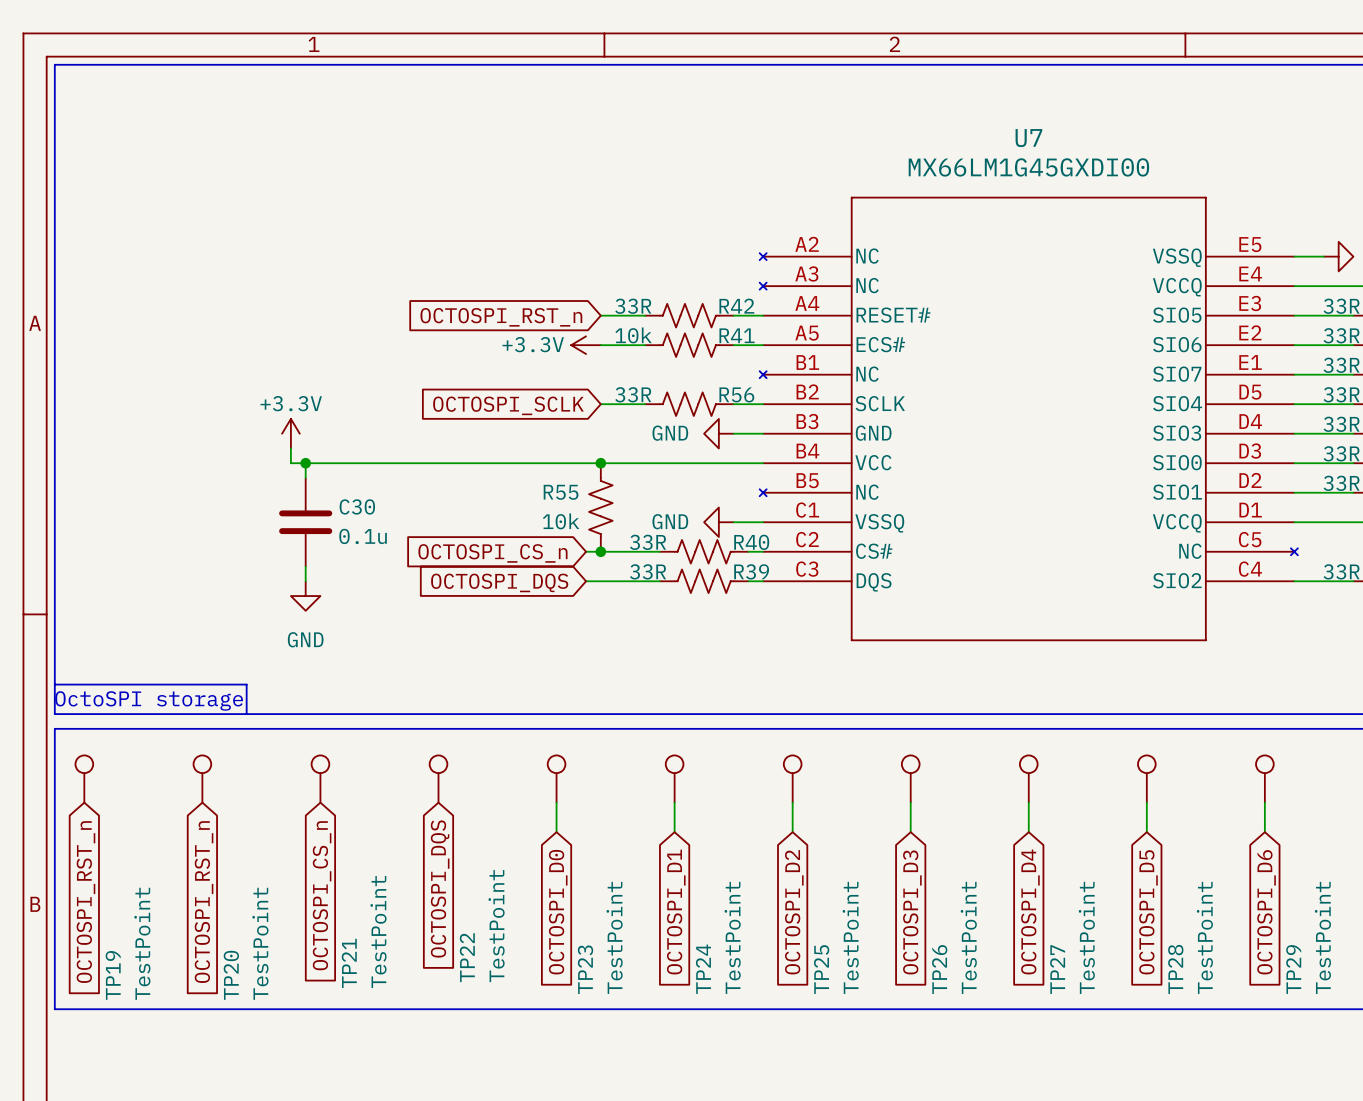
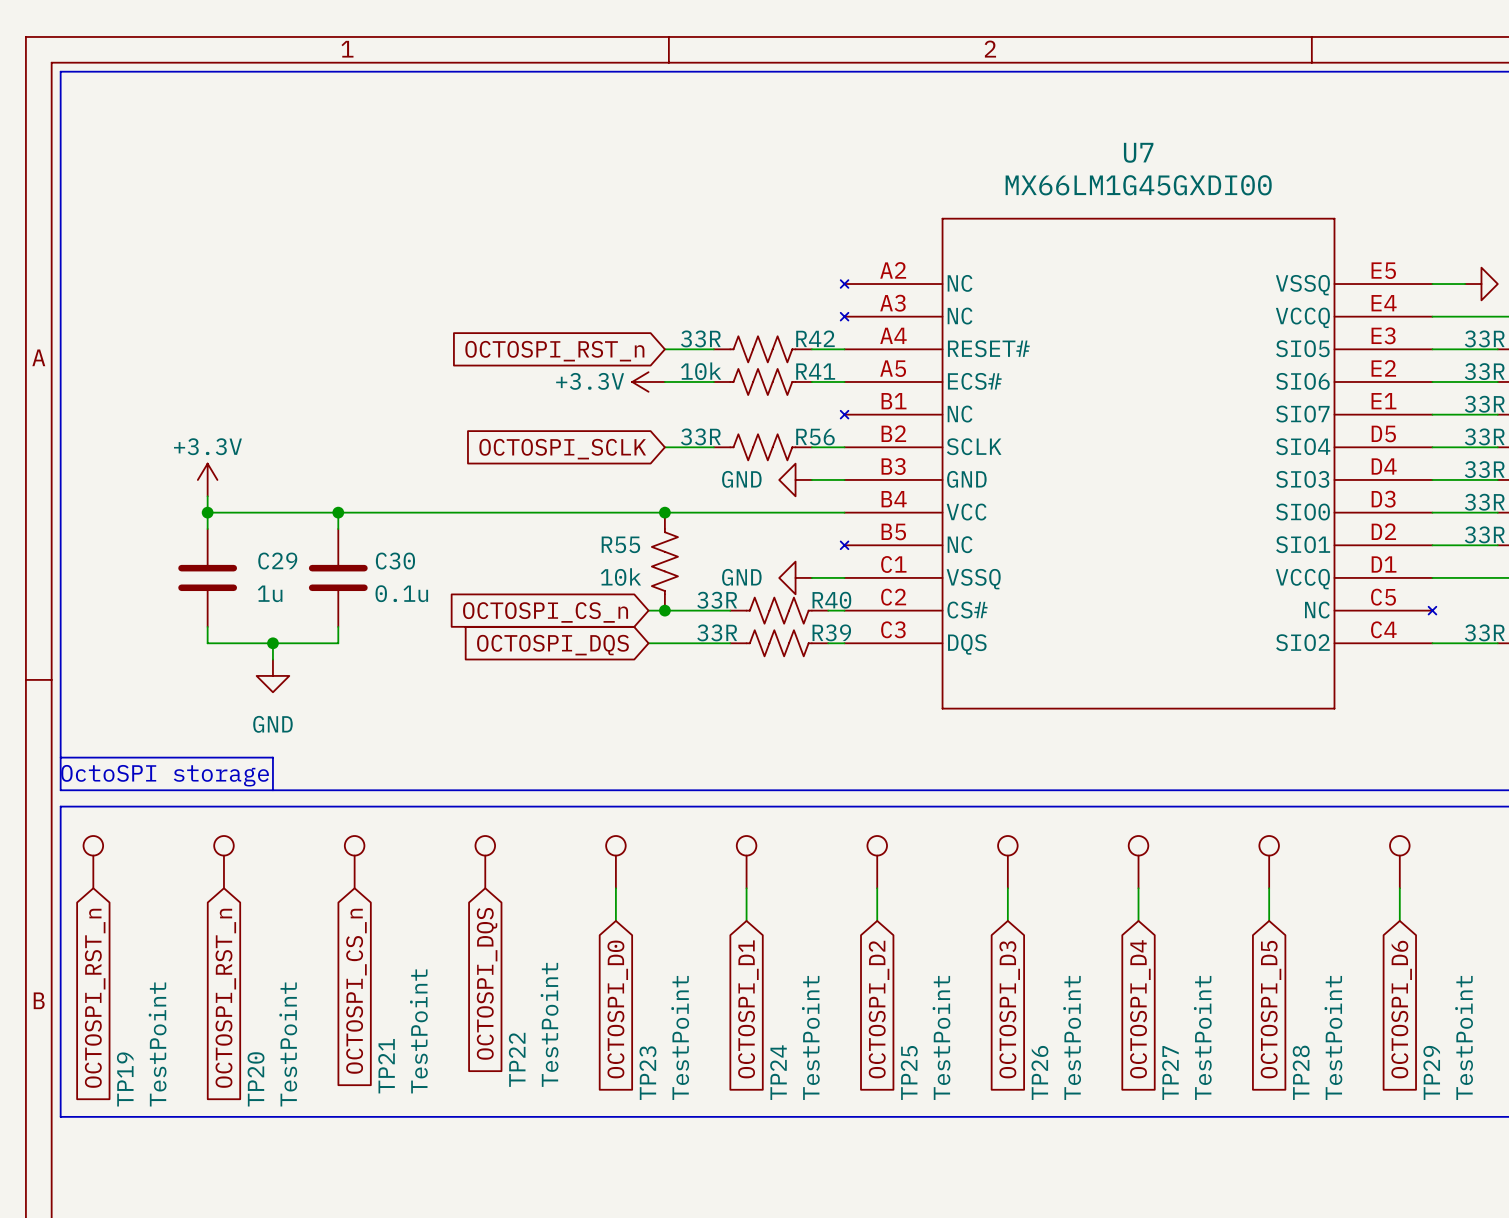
power symbol position: +3.3V (290, 433) -> +3.3V (207, 479)
wire: none -> (207, 496) (207, 528)
wire: (290, 448) (290, 463) -> (207, 512) (321, 512)
junction: none -> (207, 512)
C29: none -> 1u (207, 577)
wire: none -> (207, 626) (207, 643) (338, 643)
wire: none -> (272, 643) (272, 659)
junction: none -> (272, 643)
power symbol position: GND (305, 596) -> GND (272, 675)

